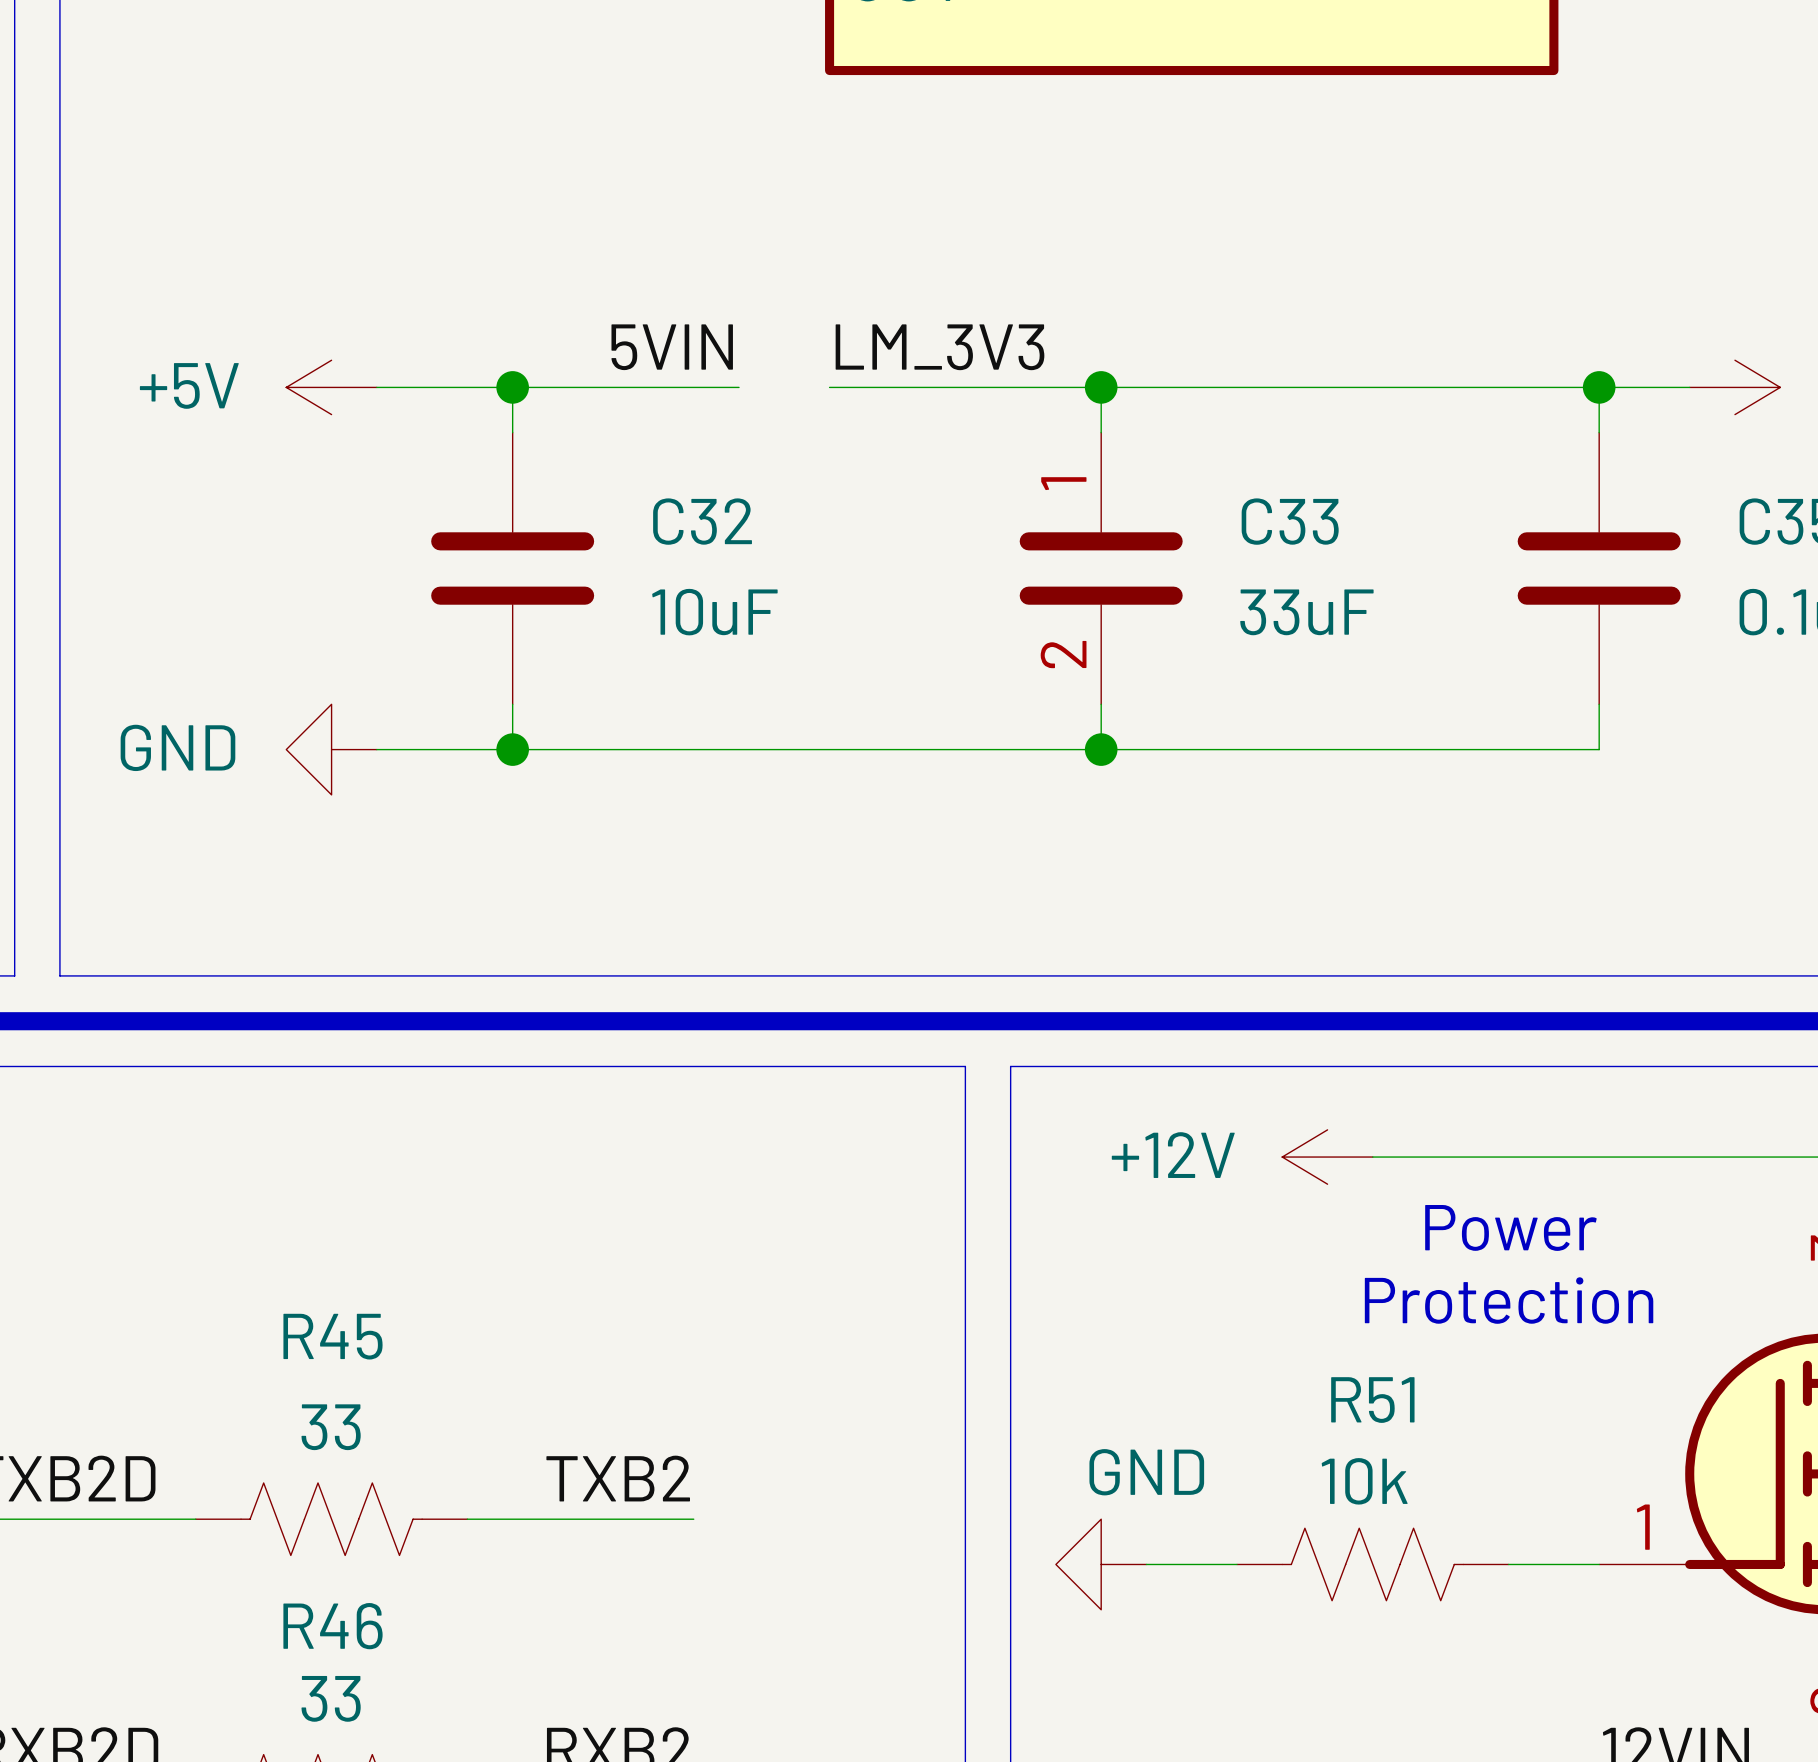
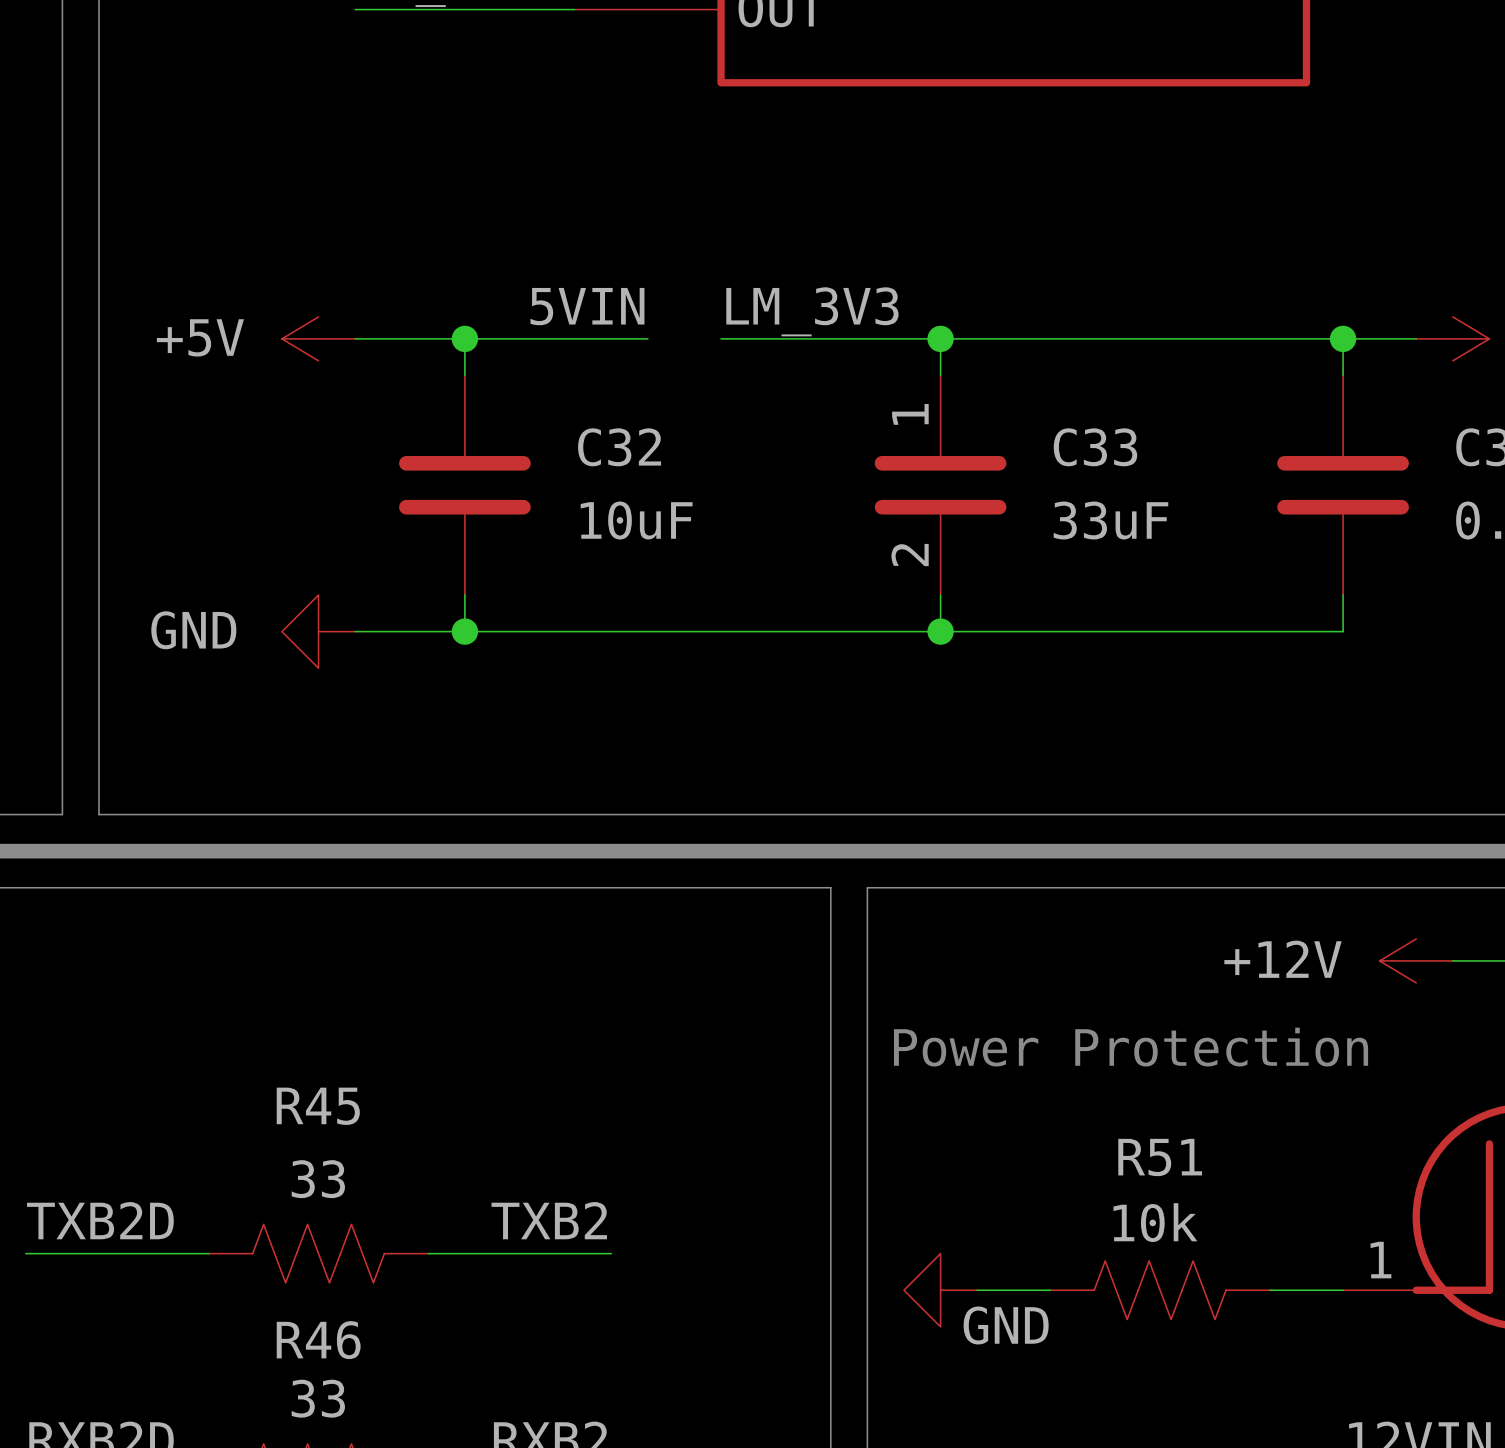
power symbol position: +12V (1327, 1157) -> +12V (1416, 960)
wire: (1372, 1157) (1734, 1157) -> none
text: Power (1510, 1227) -> none
text: Protection (1509, 1300) -> Power Protection (1131, 1047)
power symbol text position: GND (1146, 1472) -> GND (1006, 1325)

